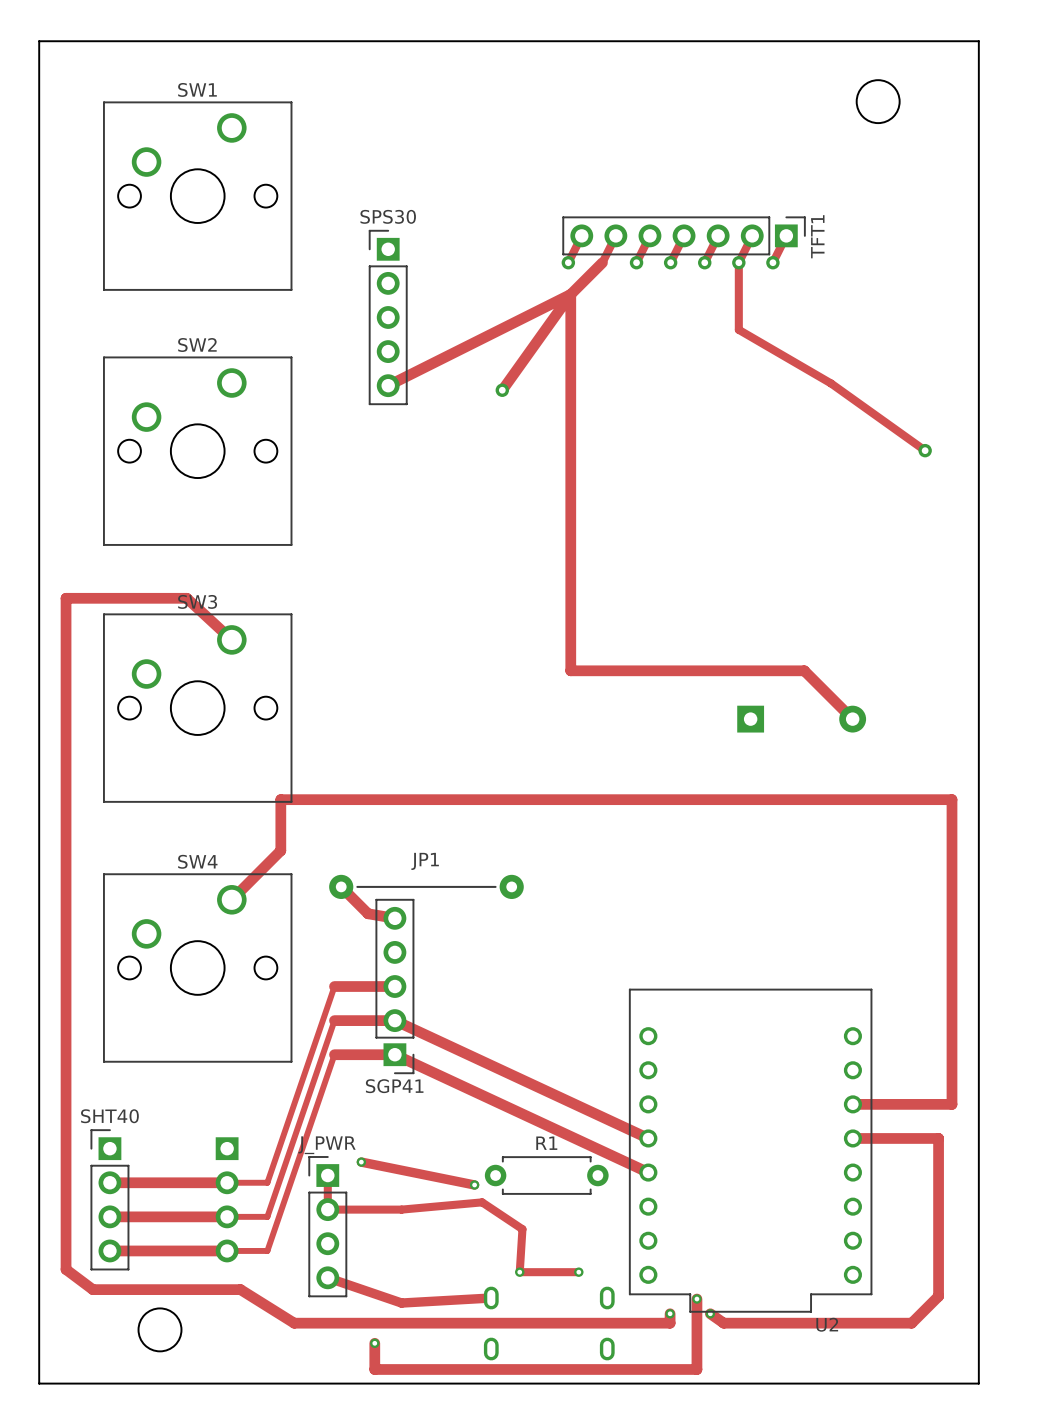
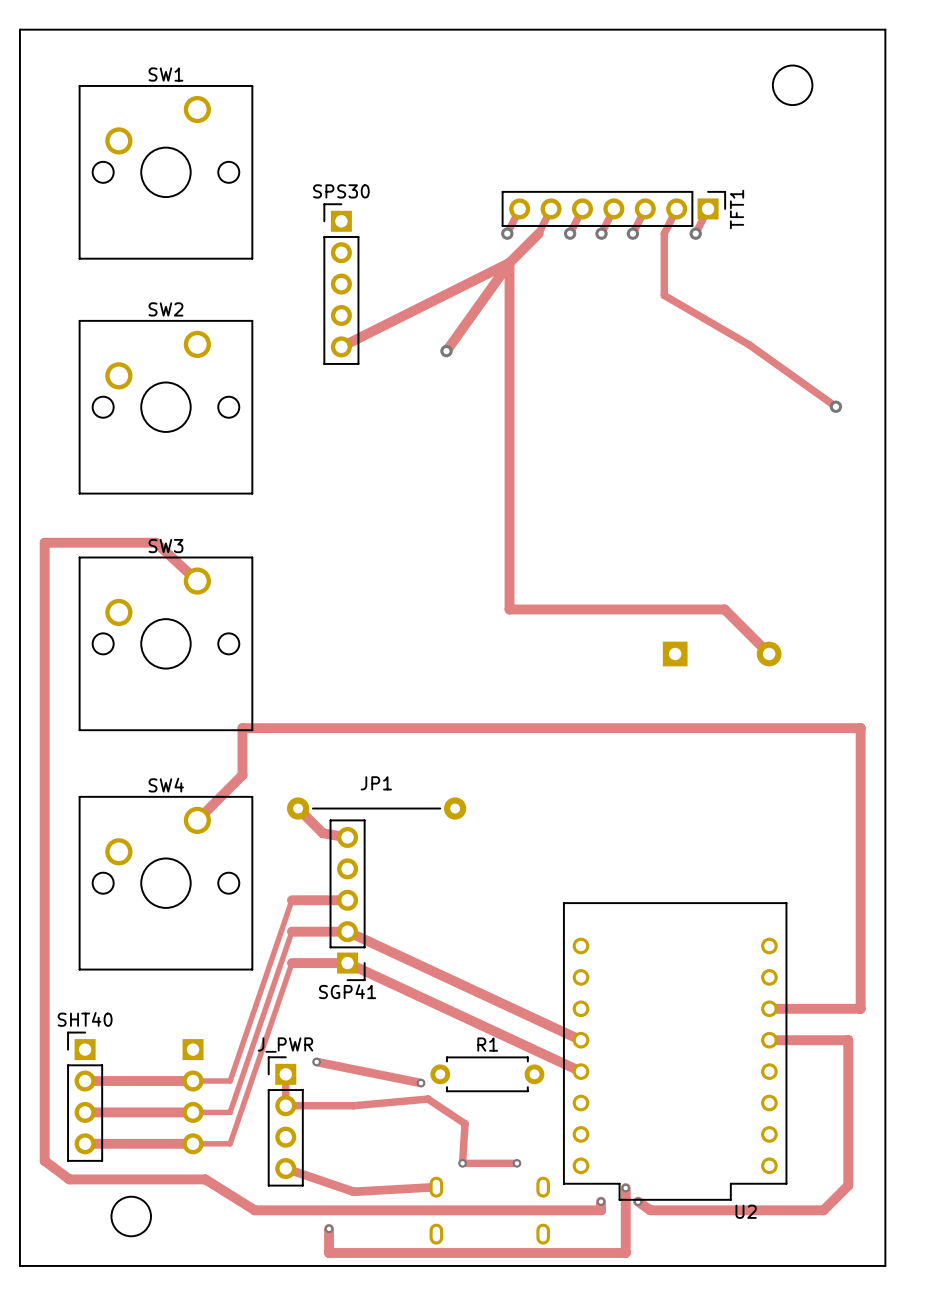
via: (738, 262) -> none

